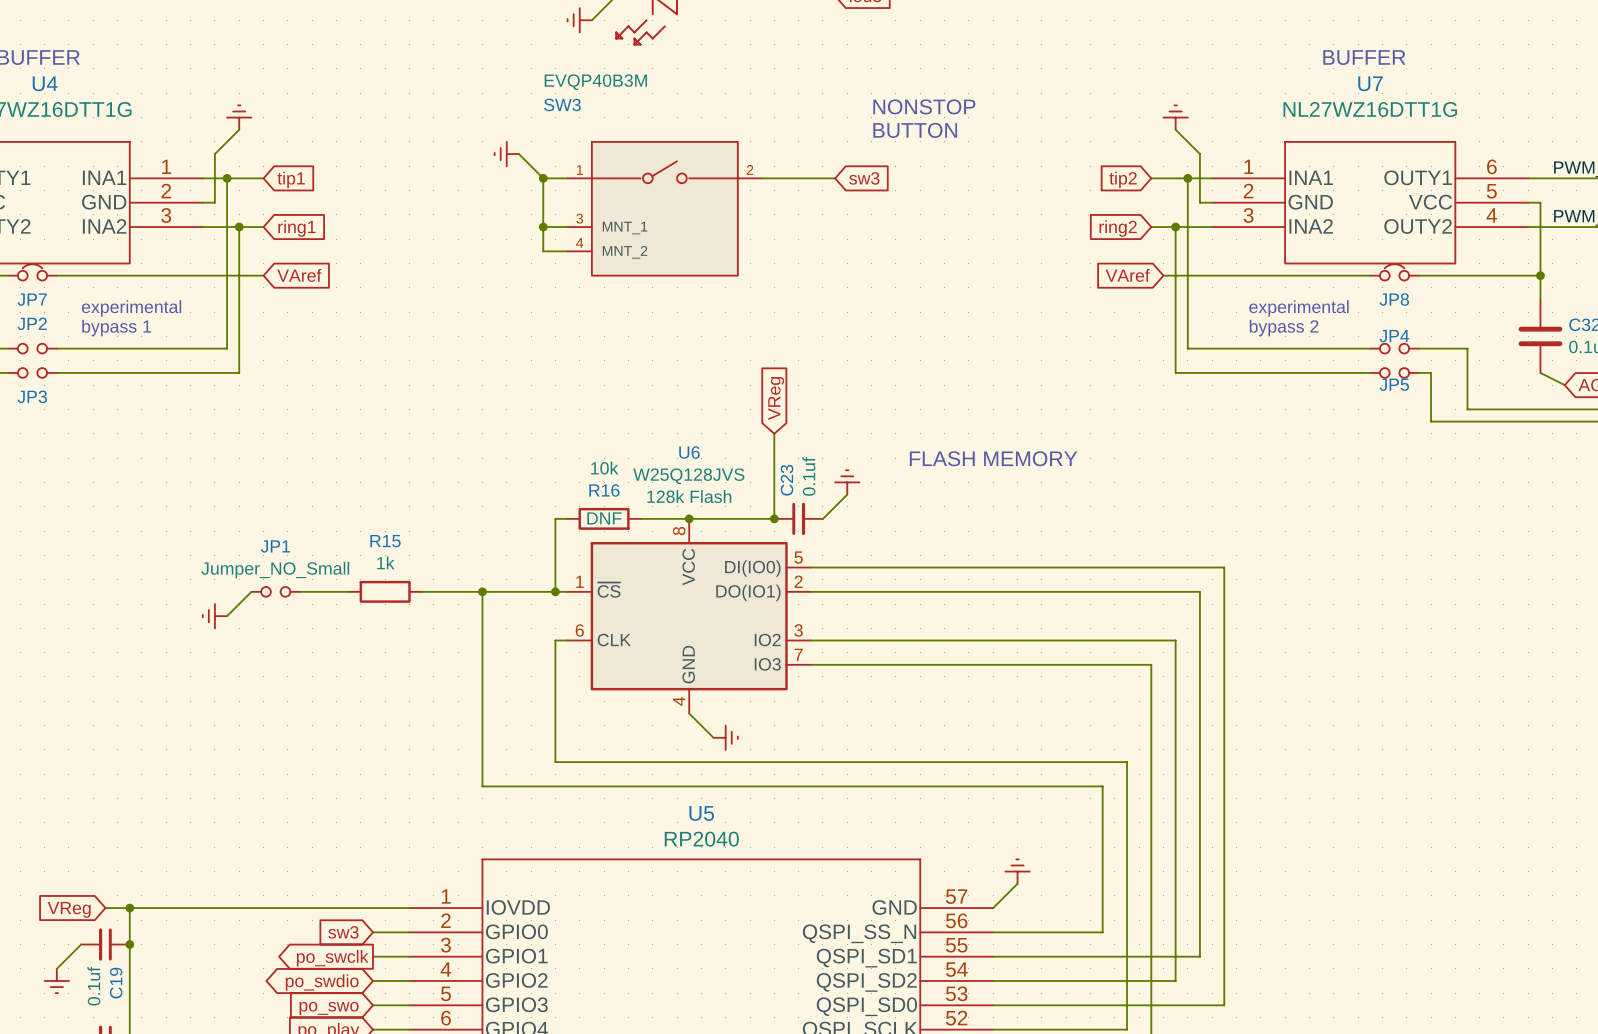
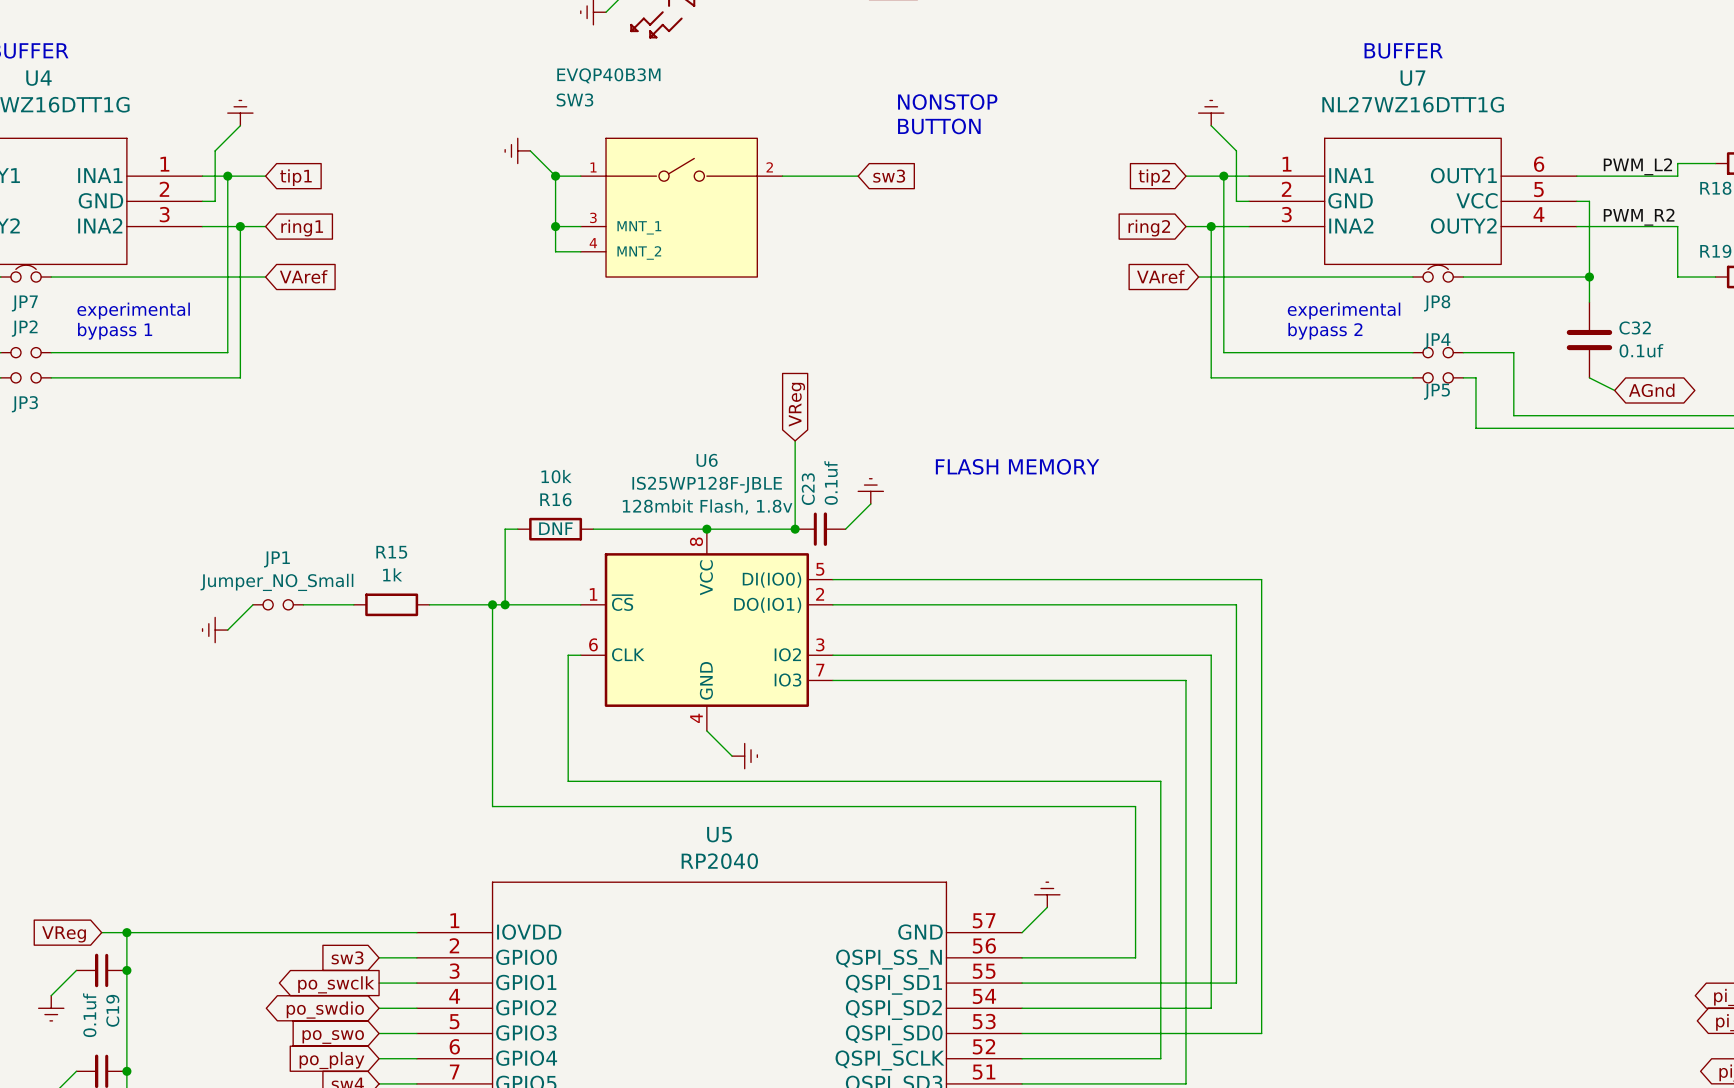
U6 value: W25Q128JVS (688, 476) -> IS25WP128F-JBLE (707, 484)
U6 text: 128k Flash (689, 496) -> 128mbit Flash, 1.8v (707, 506)
wire: (567, 518) (555, 518) (555, 591) -> (517, 529) (505, 529) (505, 604)
wire: none -> (593, 529) (656, 529)
R16 position: (604, 518) -> (555, 529)
junction: none -> (505, 604)
junction: (555, 591) -> none

